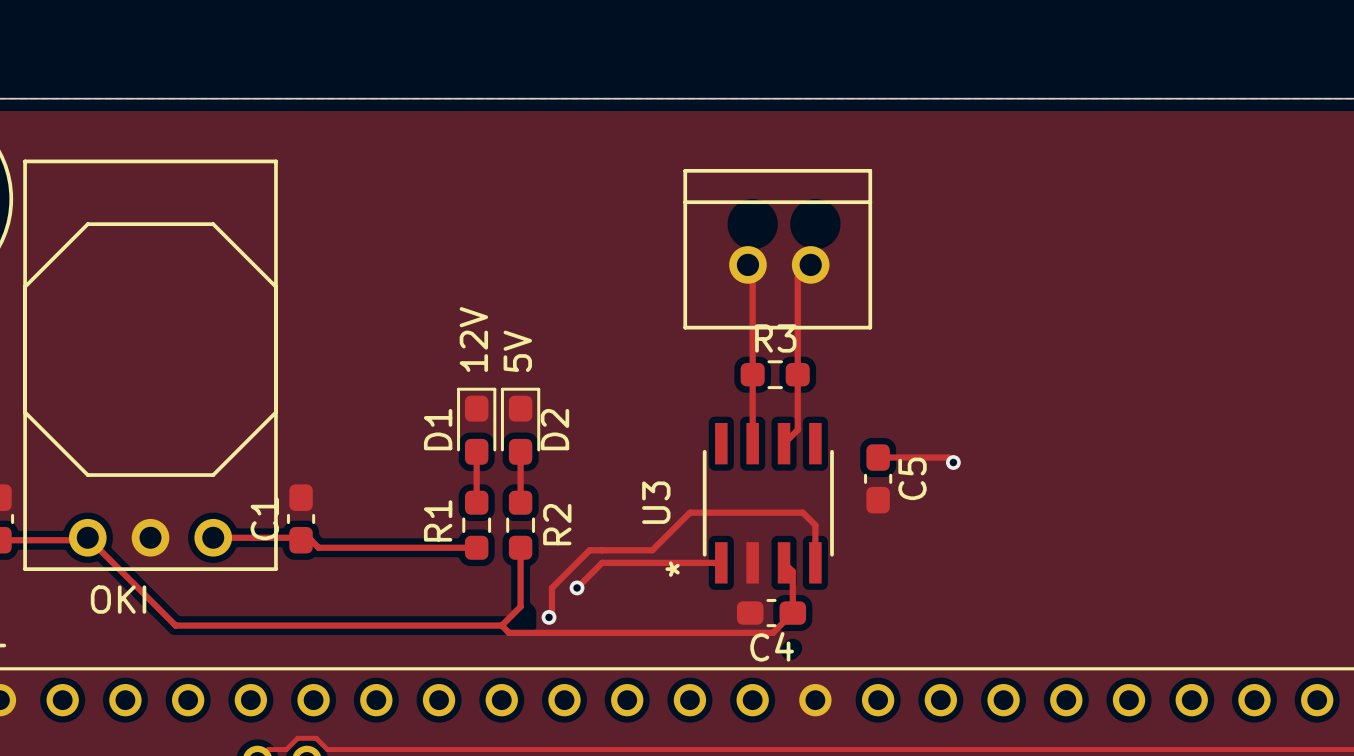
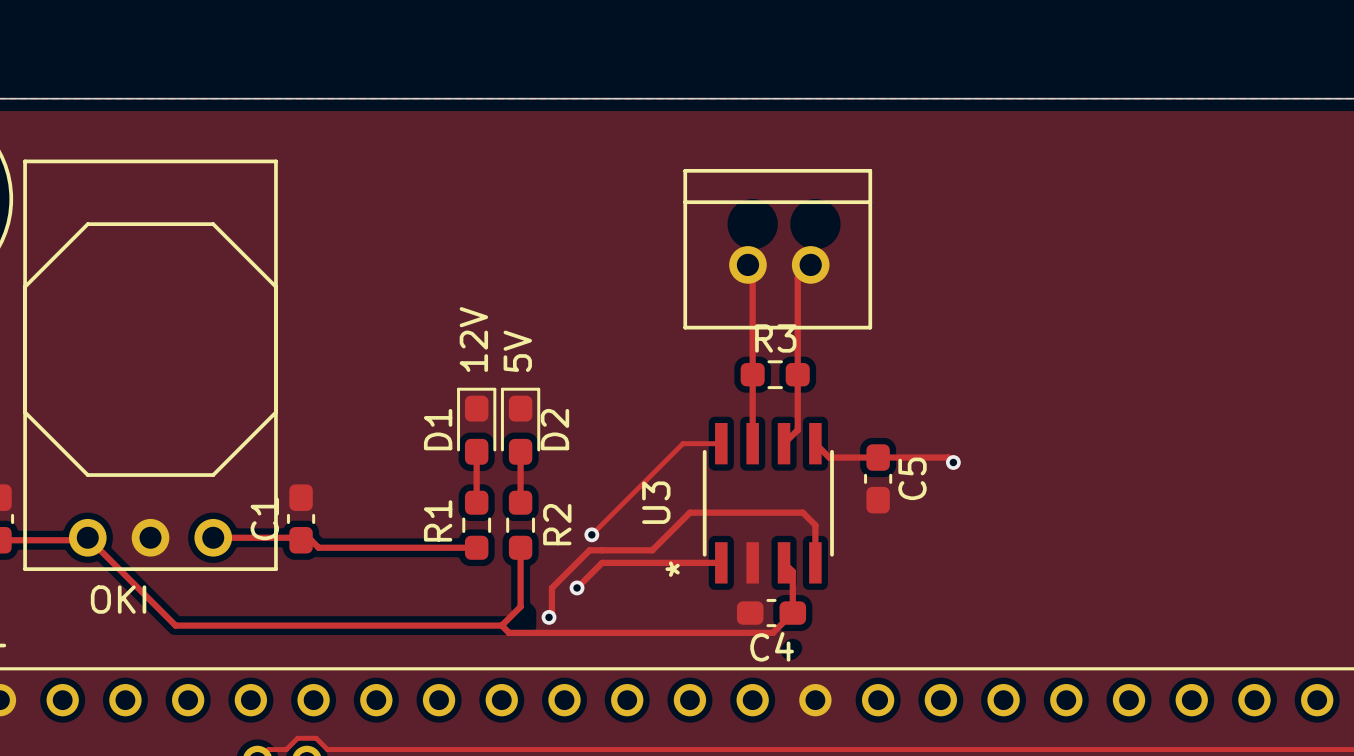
track: none -> (721, 443) (682, 443) (591, 534)
track: none -> (815, 443) (829, 457) (878, 457)
via: none -> (591, 534)

